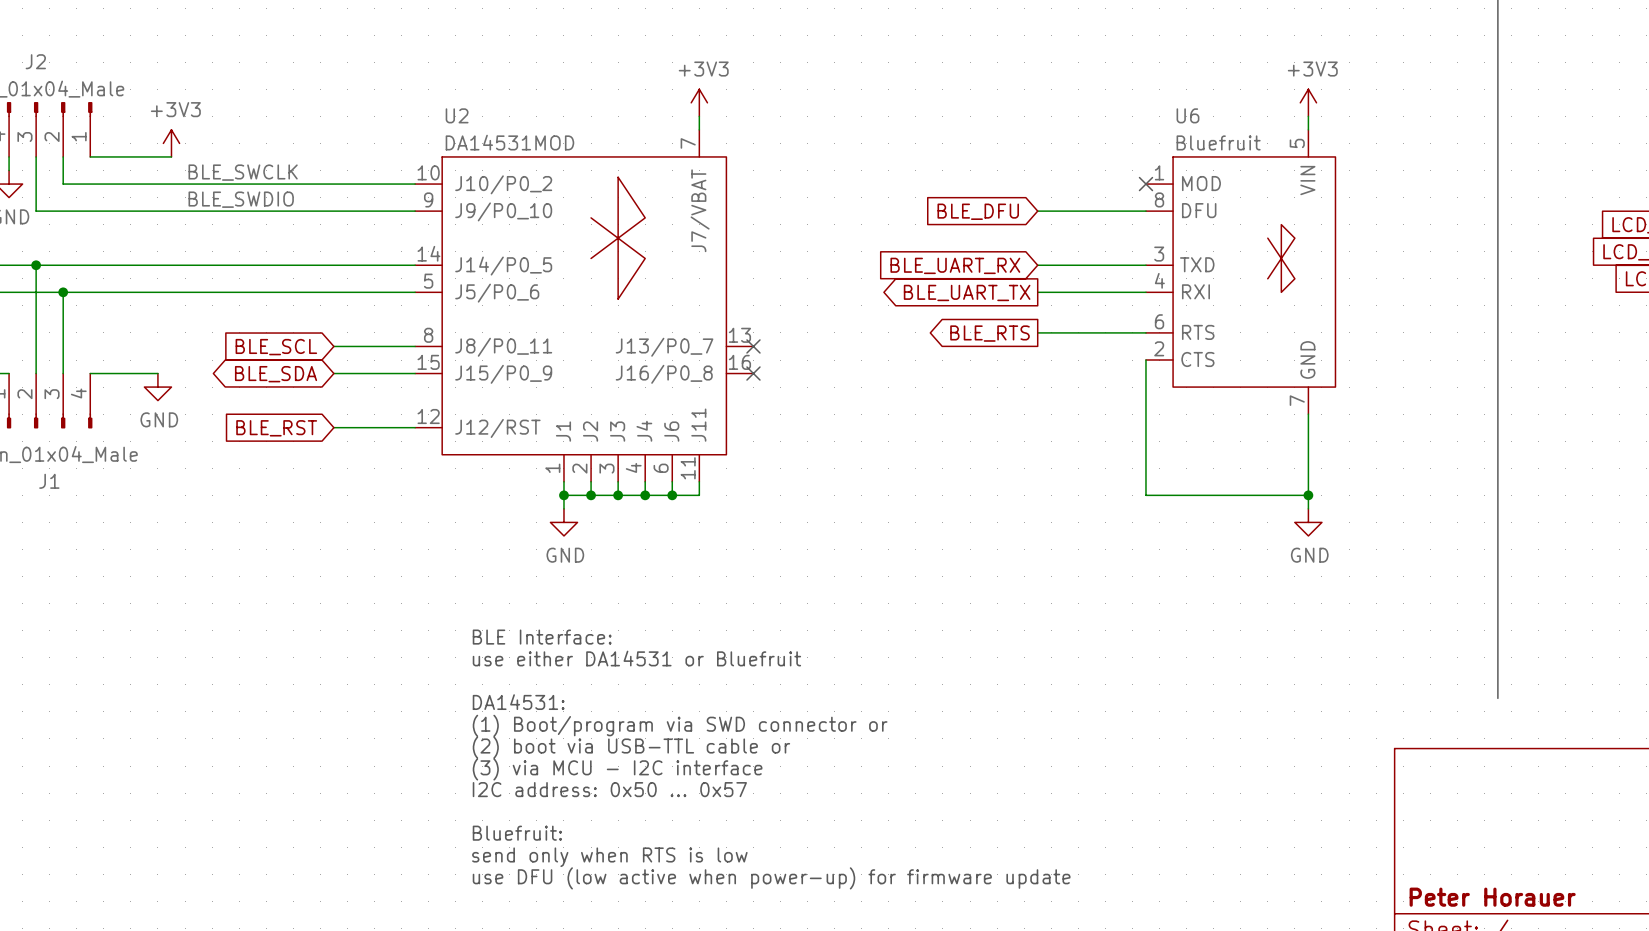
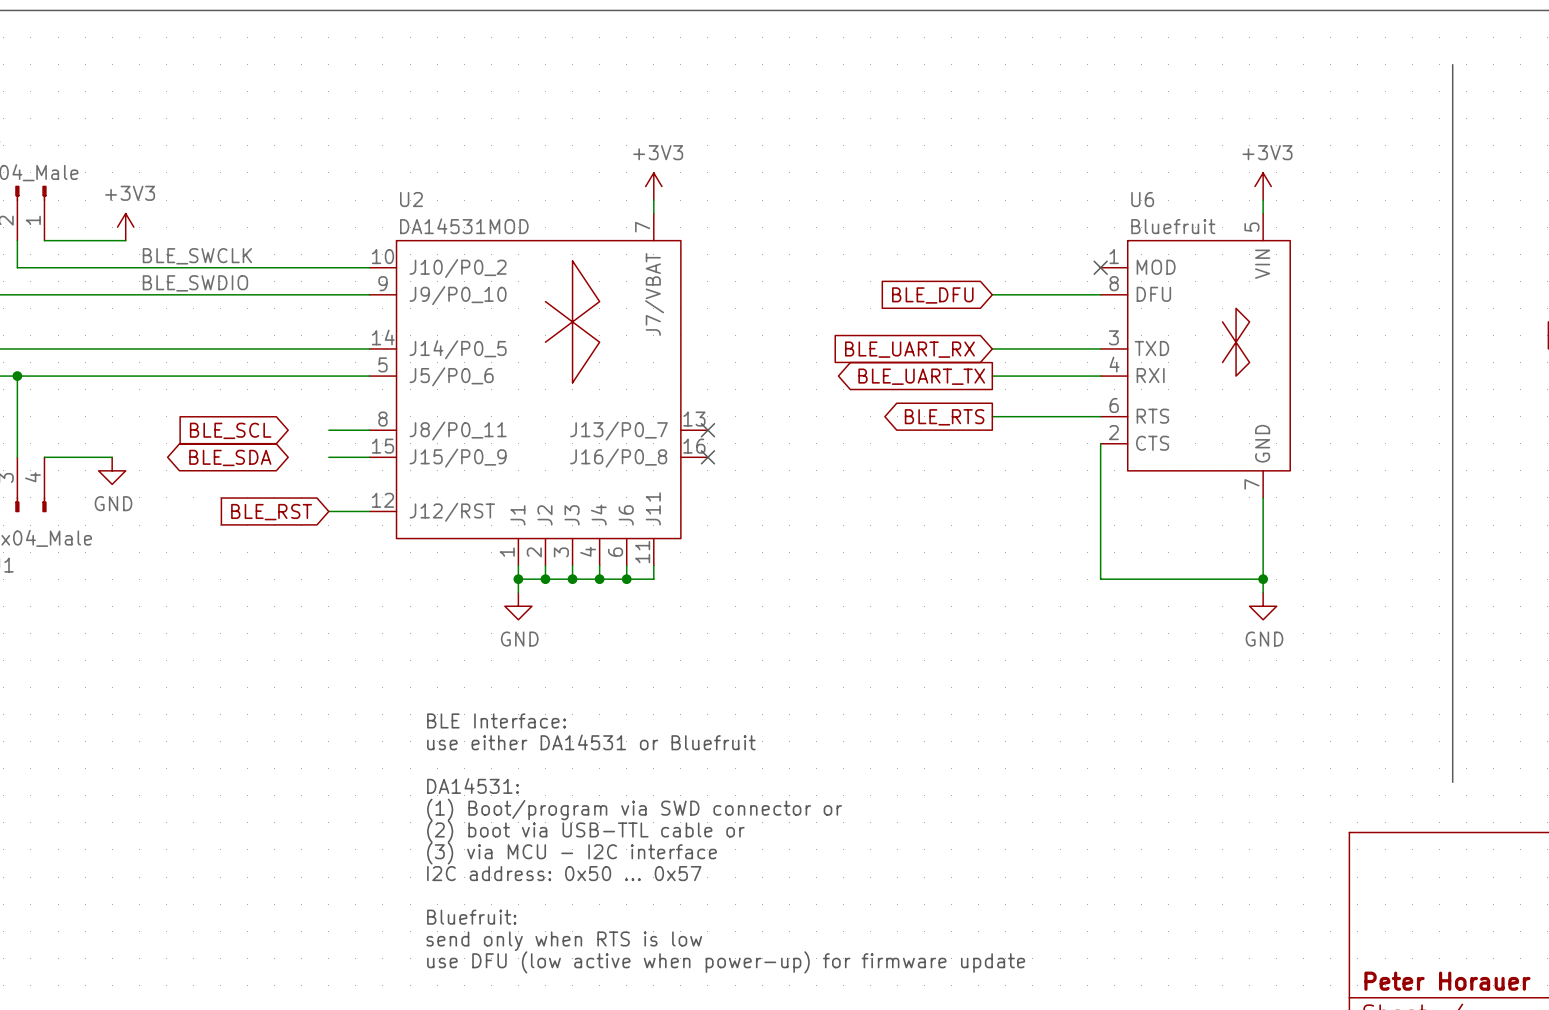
wire: (333, 346) (374, 346) -> none
wire: (333, 373) (374, 373) -> none
wire: (333, 427) (374, 427) -> none
global label position: BLE_RST (276, 428) -> BLE_RST (271, 512)

